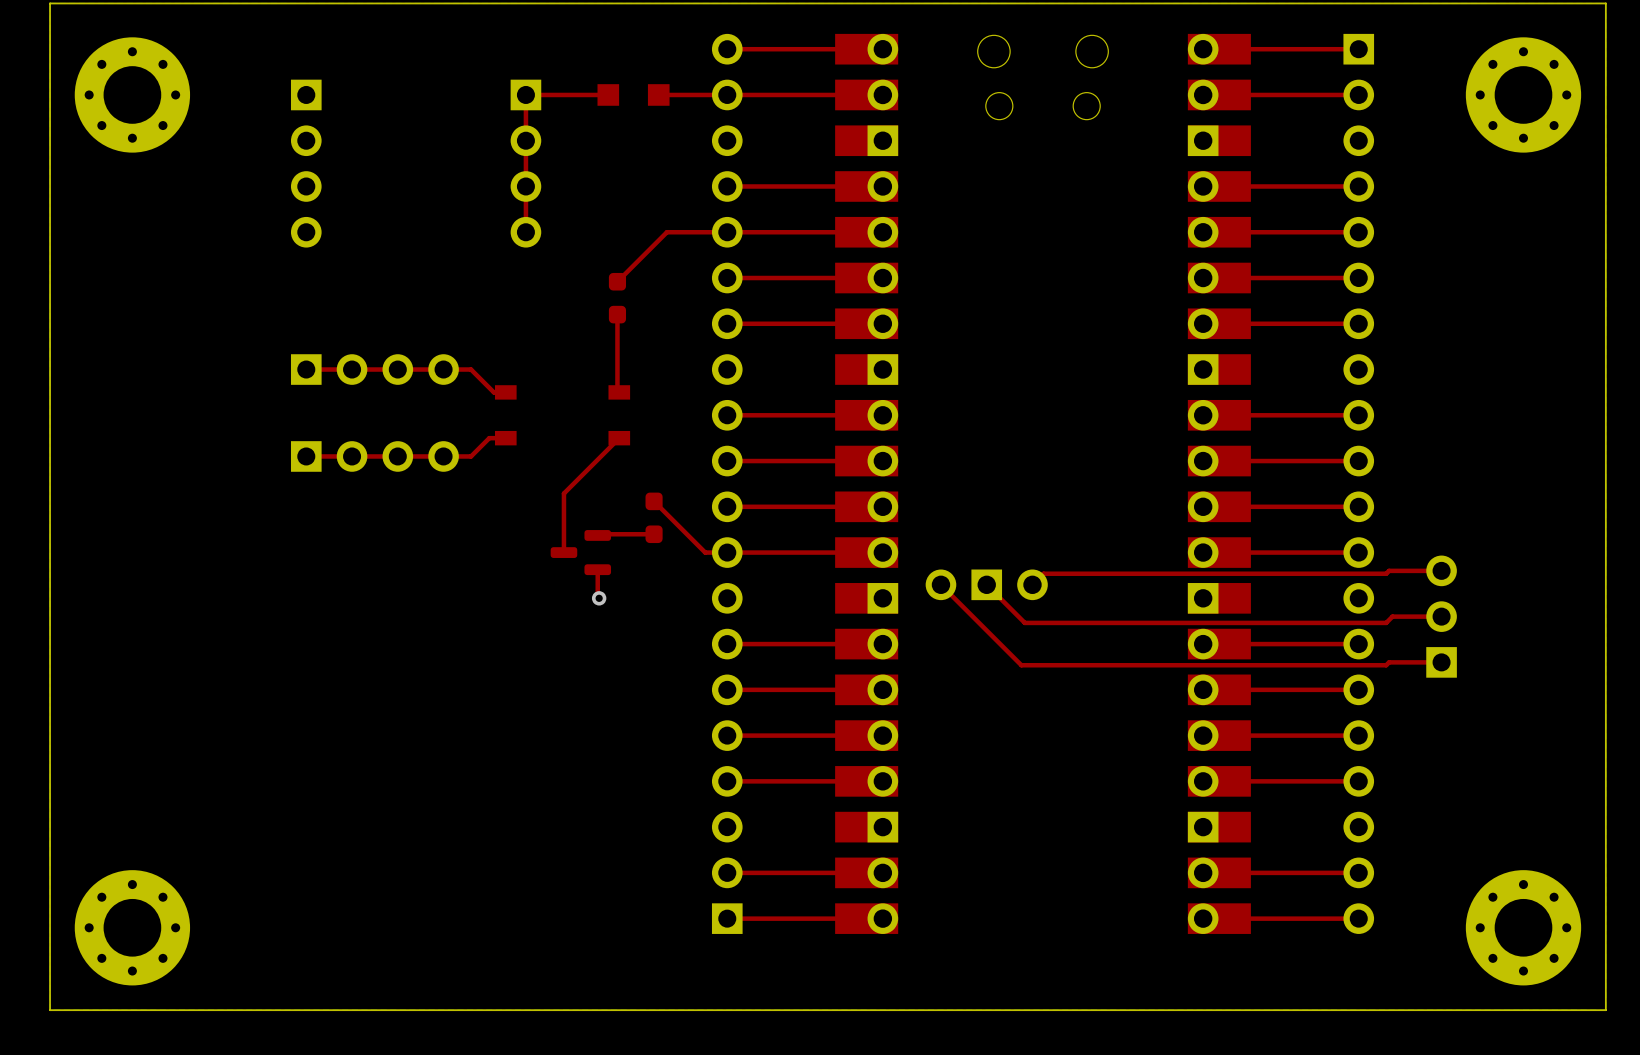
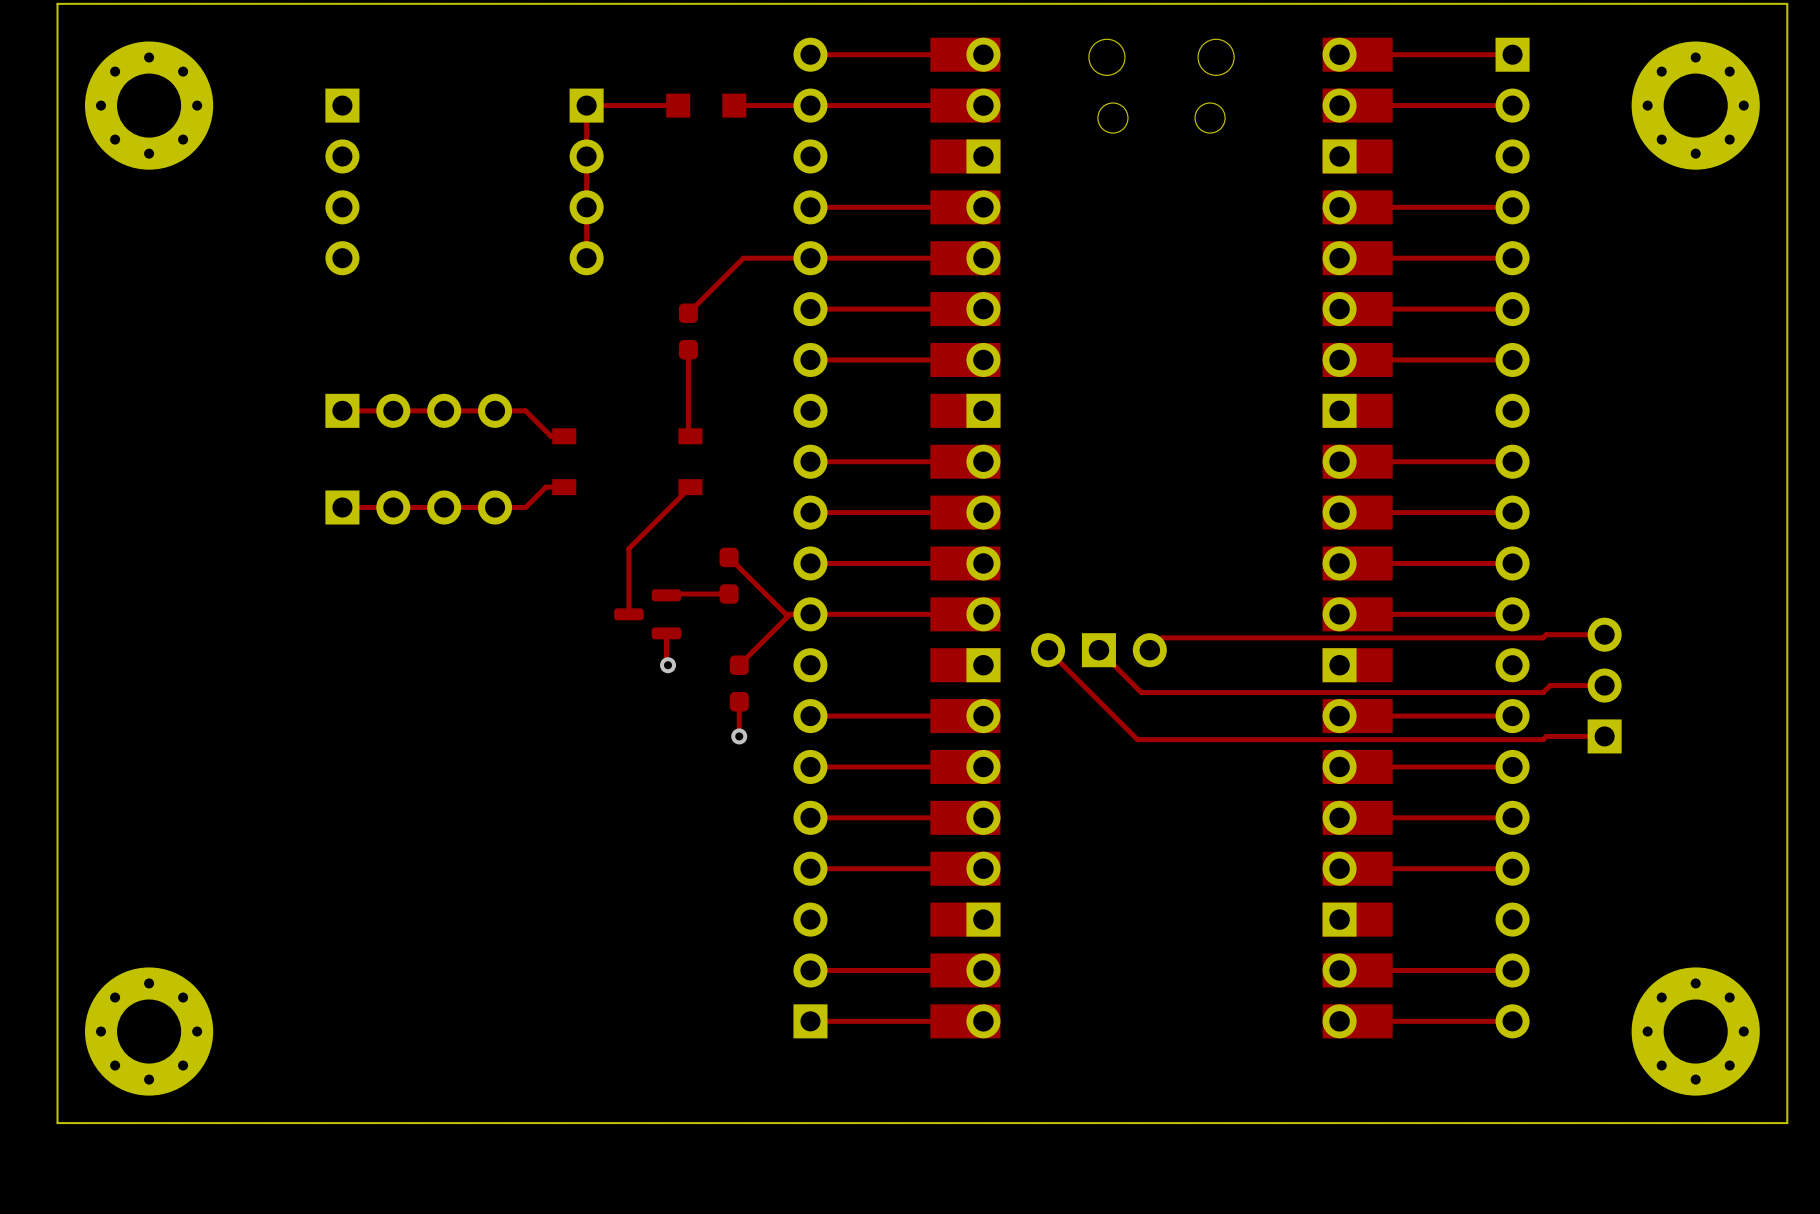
top track: none -> (790, 614) (739, 665)
part: none -> (739, 683)
top track: none -> (739, 701) (739, 736)
via: none -> (739, 736)

